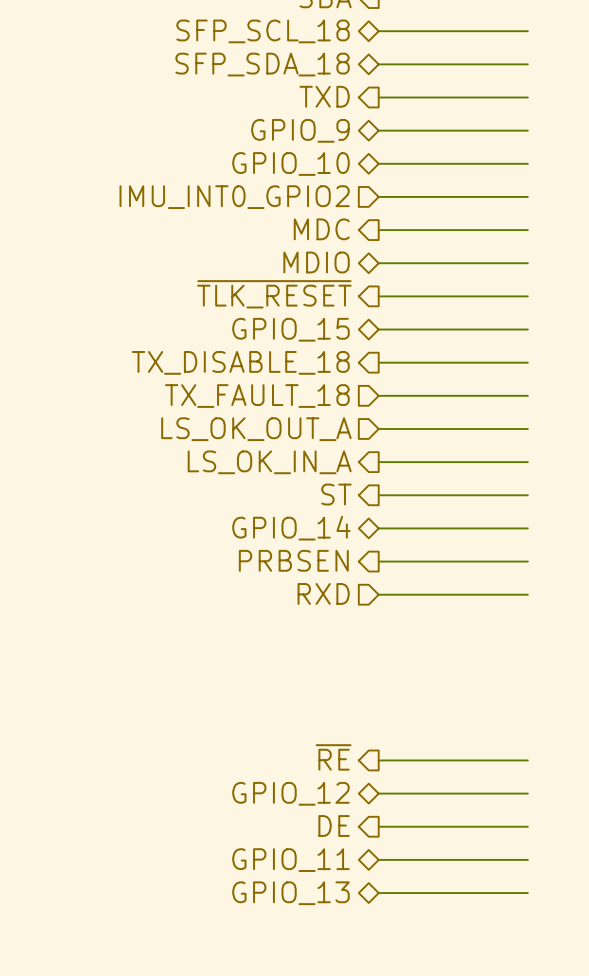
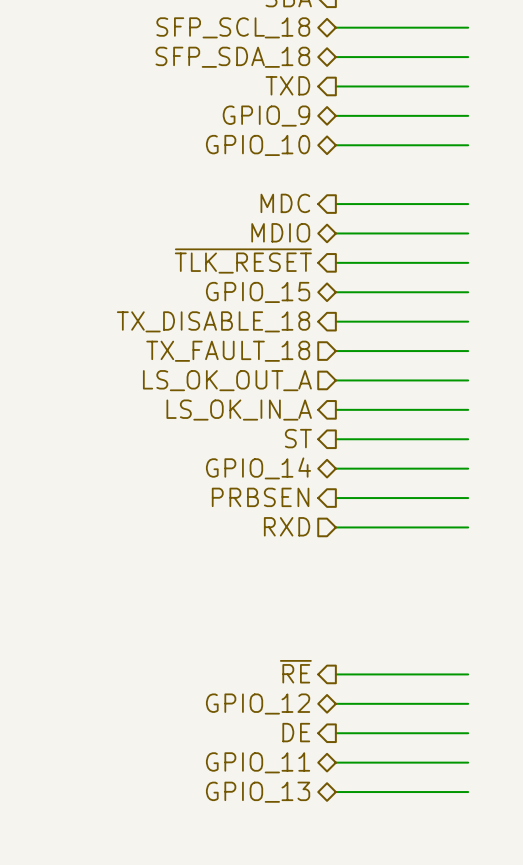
wire: (378, 196) (527, 196) -> none
hierarchical label: IMU_INT0_GPIO2 (234, 197) -> none

